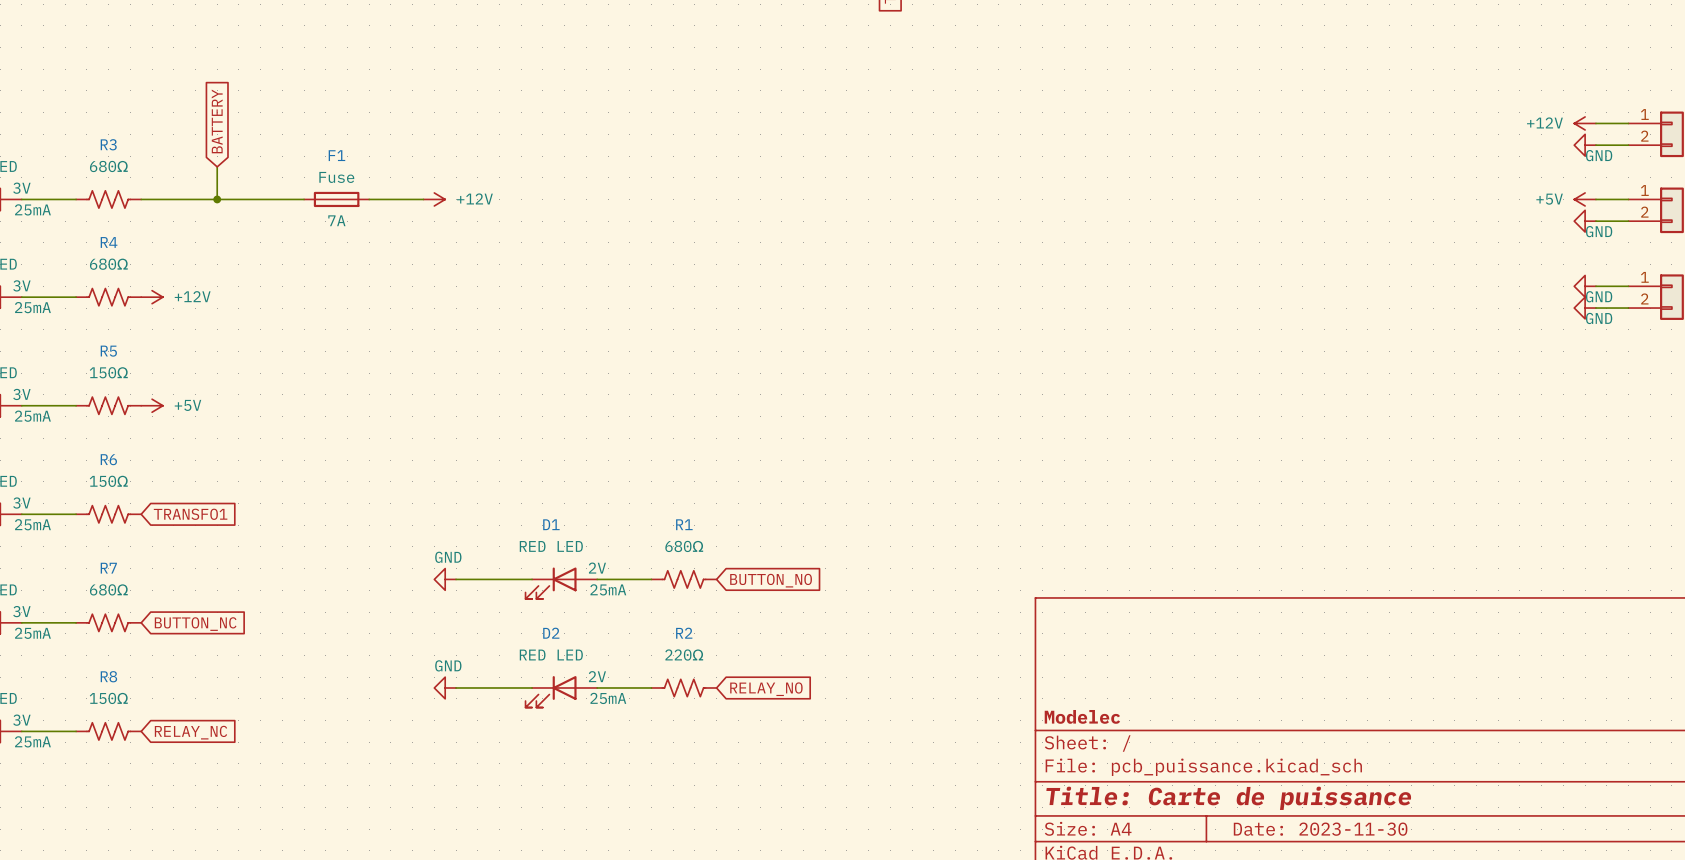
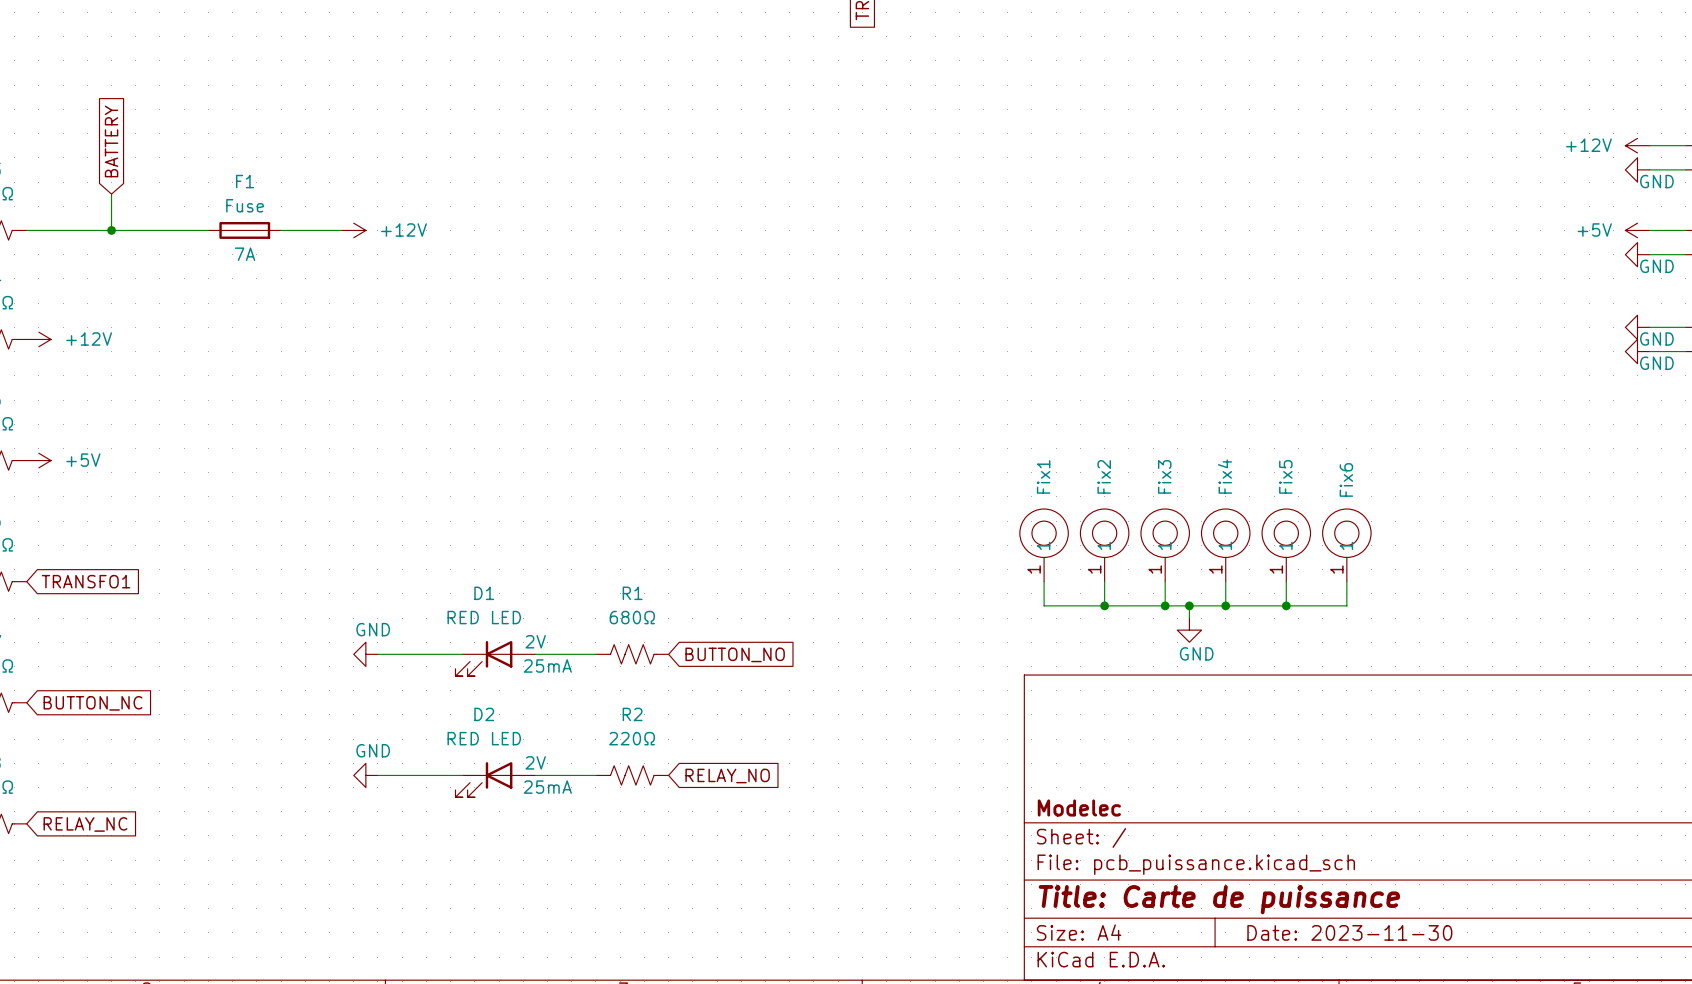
Fix1: none -> (1044, 545)
Fix2: none -> (1104, 545)
Fix3: none -> (1165, 545)
Fix4: none -> (1225, 545)
Fix5: none -> (1286, 545)
Fix6: none -> (1346, 545)
wire: none -> (1044, 581) (1044, 605) (1346, 605) (1346, 581)
wire: none -> (1104, 581) (1104, 605)
wire: none -> (1165, 581) (1165, 605)
wire: none -> (1225, 581) (1225, 605)
wire: none -> (1286, 581) (1286, 605)
junction: none -> (1104, 605)
junction: none -> (1165, 605)
wire: none -> (1189, 605) (1189, 618)
junction: none -> (1189, 605)
junction: none -> (1225, 605)
junction: none -> (1286, 605)
power symbol: none -> GND (1189, 630)

